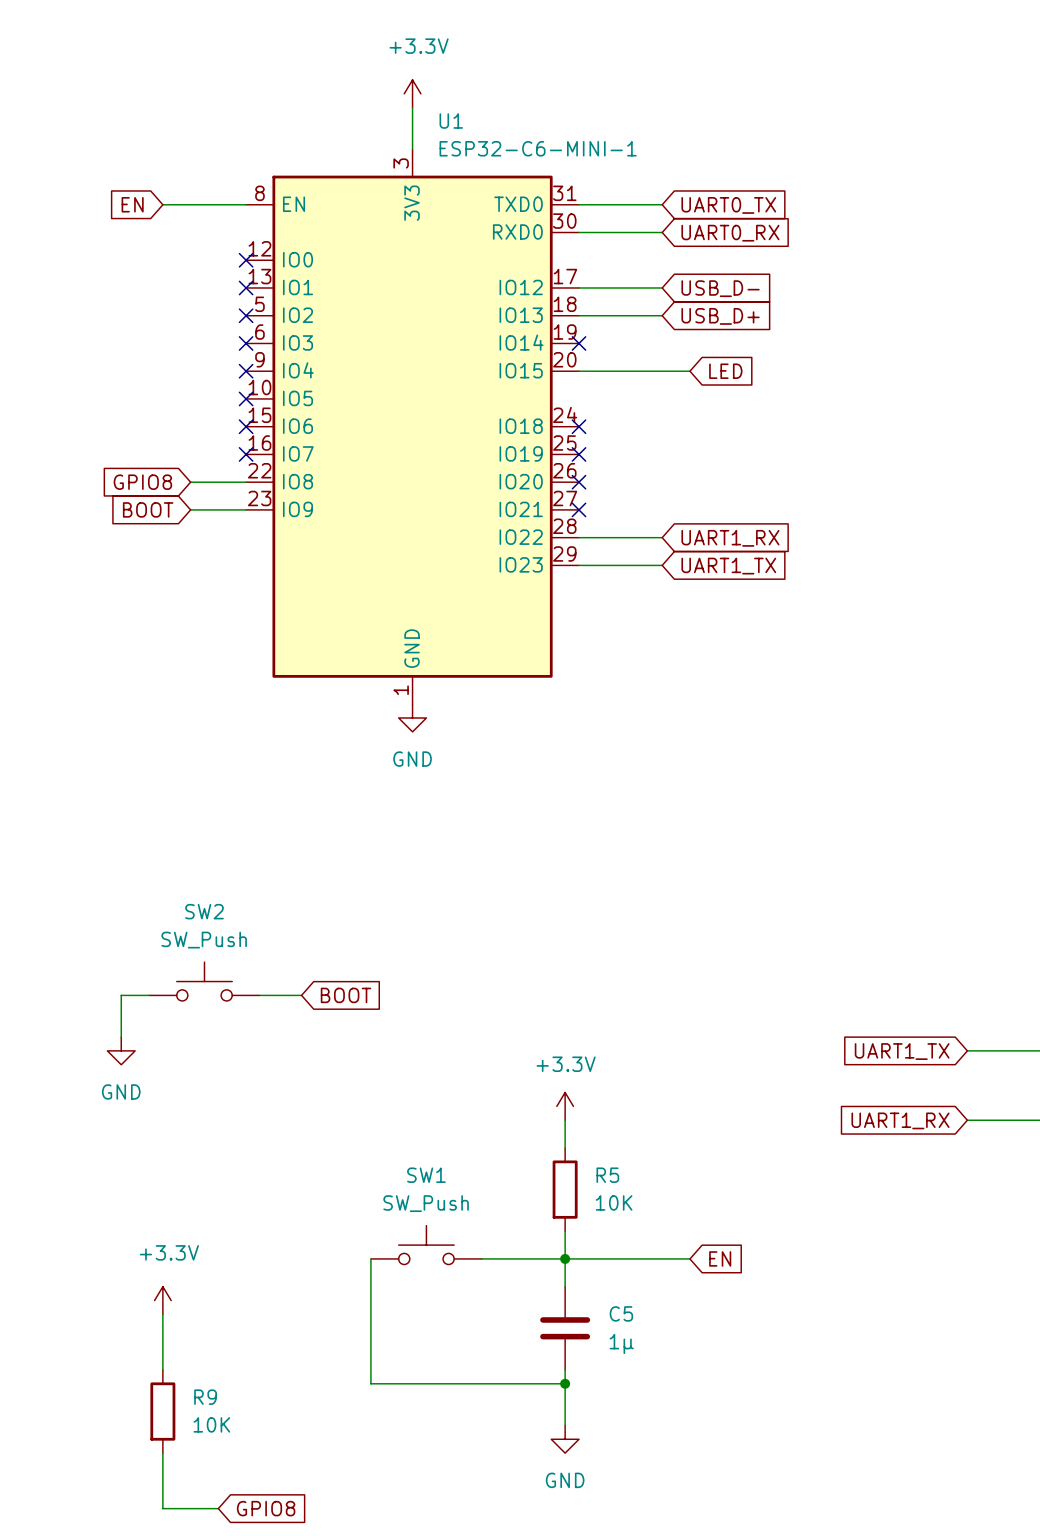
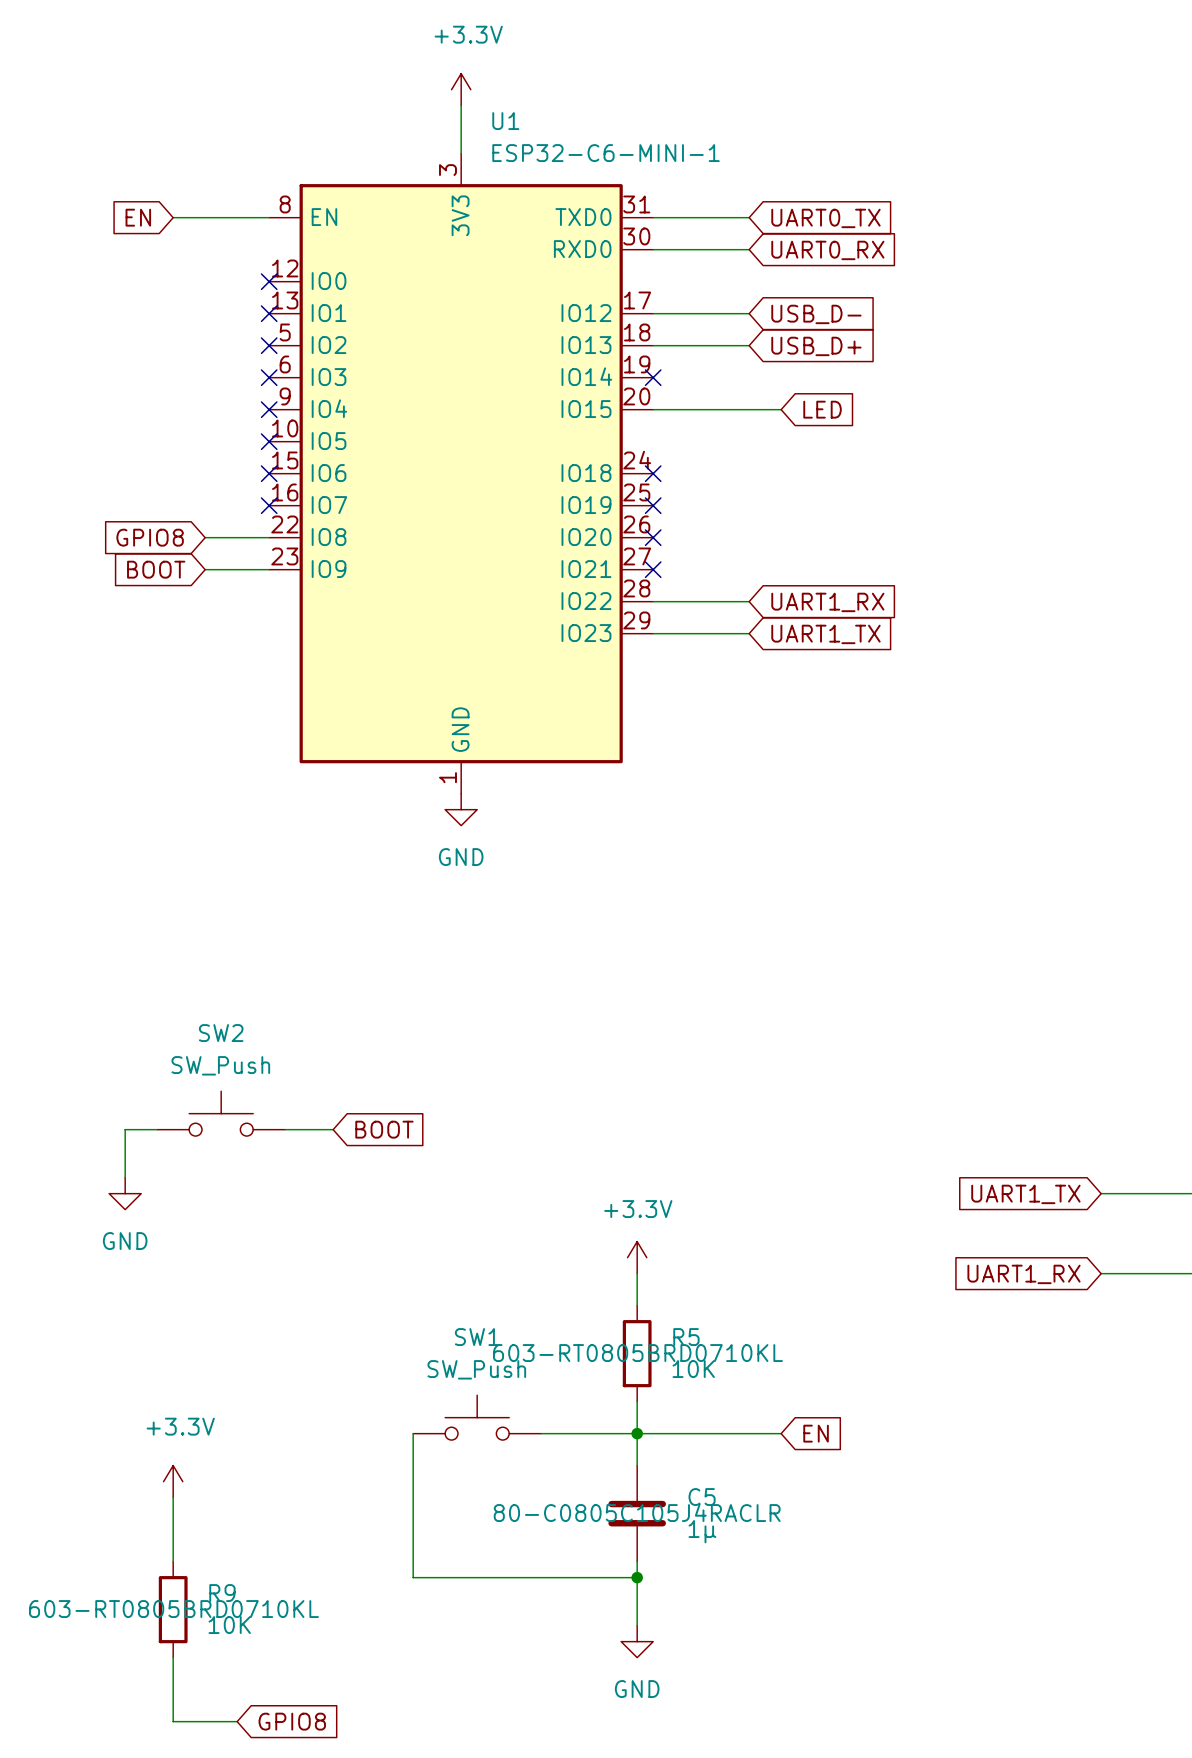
R5 text: none -> 603-RT0805BRD0710KL (637, 1353)
C5 text: none -> 80-C0805C105J4RACLR (637, 1512)
R9 text: none -> 603-RT0805BRD0710KL (173, 1609)

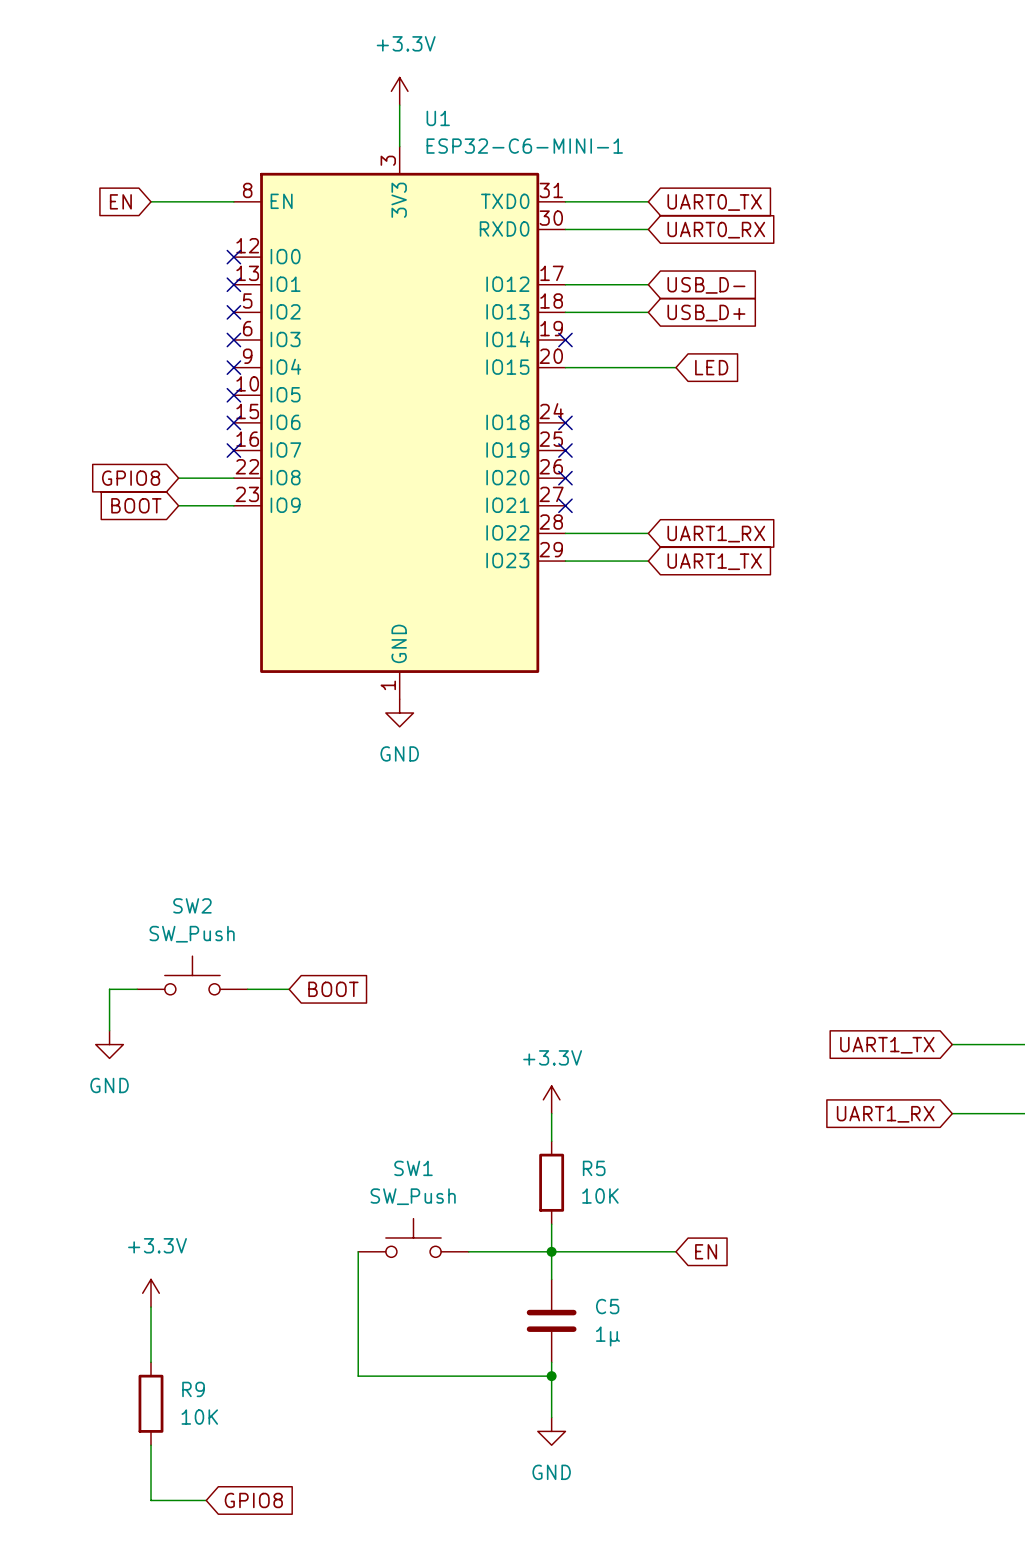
R5 text: 603-RT0805BRD0710KL (637, 1353) -> none
C5 text: 80-C0805C105J4RACLR (637, 1512) -> none
R9 text: 603-RT0805BRD0710KL (173, 1609) -> none

